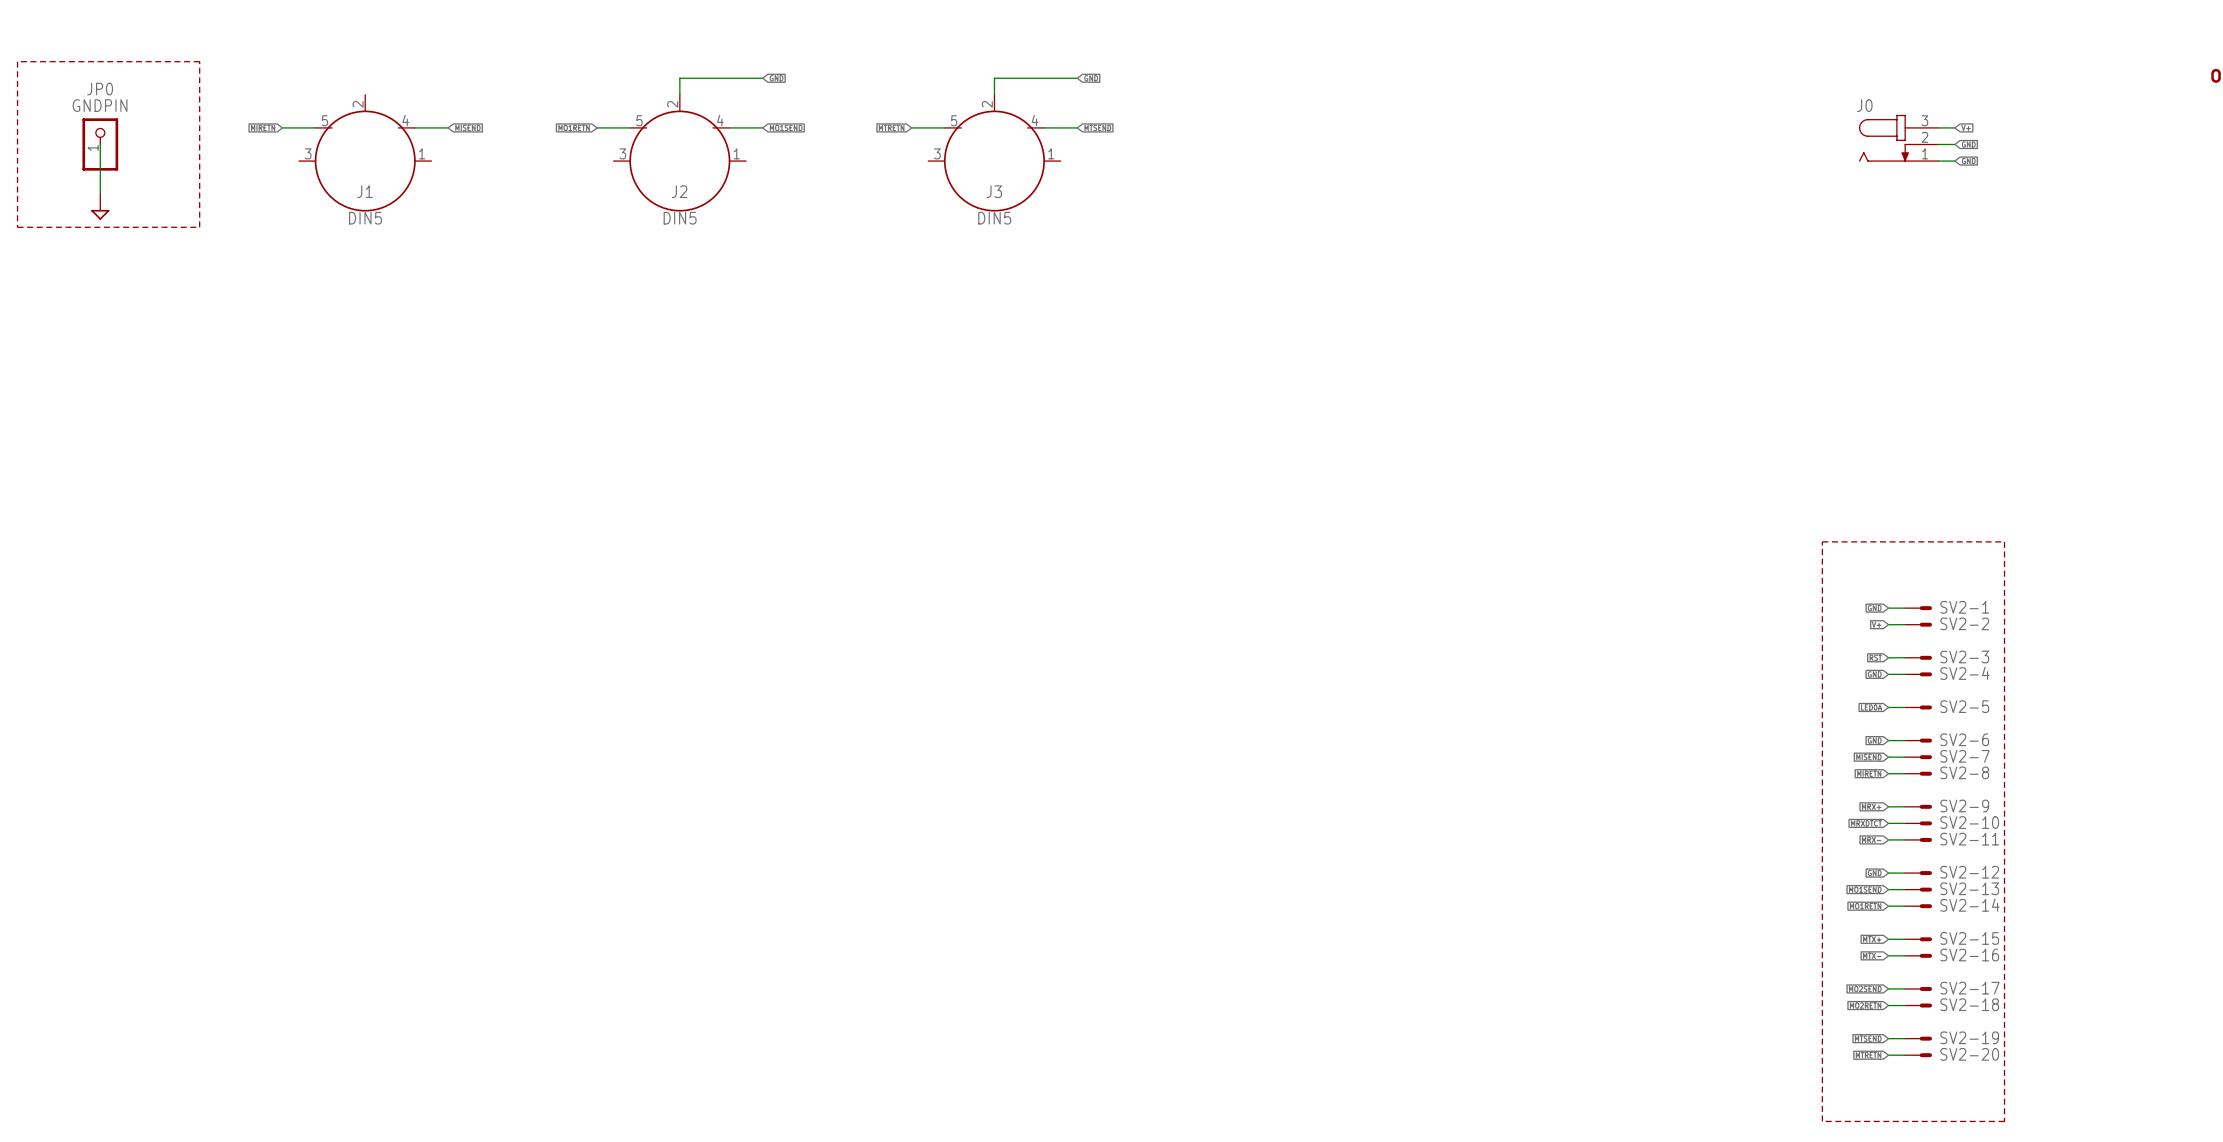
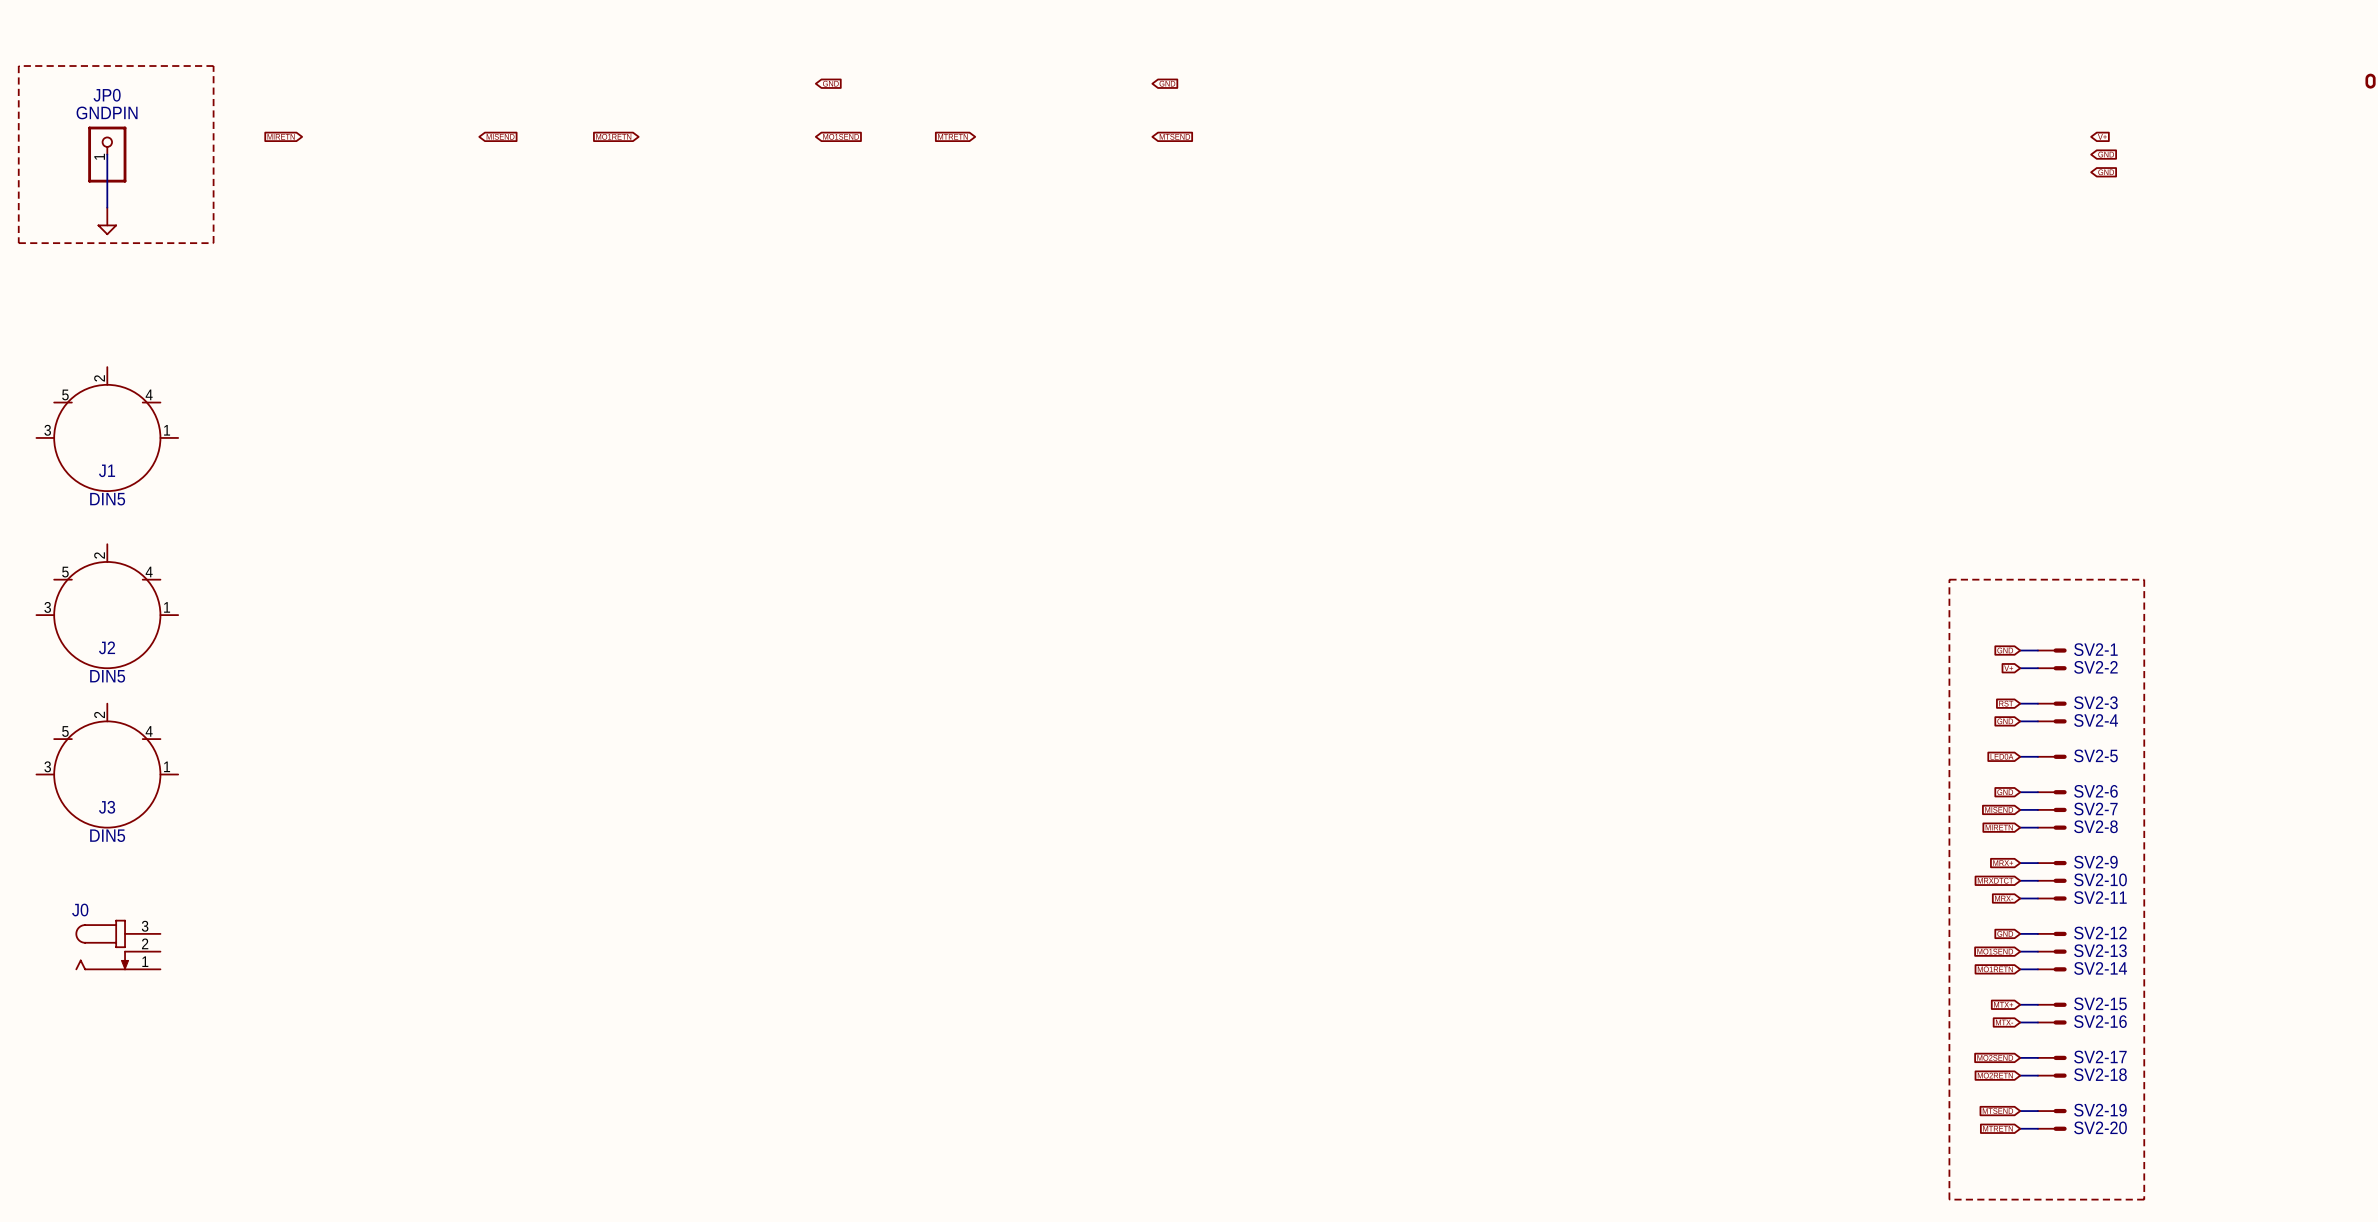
wire: (762, 78) (679, 78) (679, 94) -> none
wire: (1077, 78) (994, 78) (994, 94) -> none
wire: (282, 127) (315, 127) -> none
wire: (414, 127) (448, 127) -> none
wire: (597, 127) (630, 127) -> none
wire: (729, 127) (762, 127) -> none
wire: (911, 127) (944, 127) -> none
wire: (1044, 127) (1077, 127) -> none
wire: (1938, 127) (1954, 127) -> none
J0 position: (1898, 138) -> (118, 944)
wire: (1938, 144) (1954, 144) -> none
J1 position: (365, 153) -> (107, 429)
J2 position: (679, 153) -> (107, 606)
J3 position: (994, 153) -> (107, 766)
wire: (1938, 161) (1954, 161) -> none

